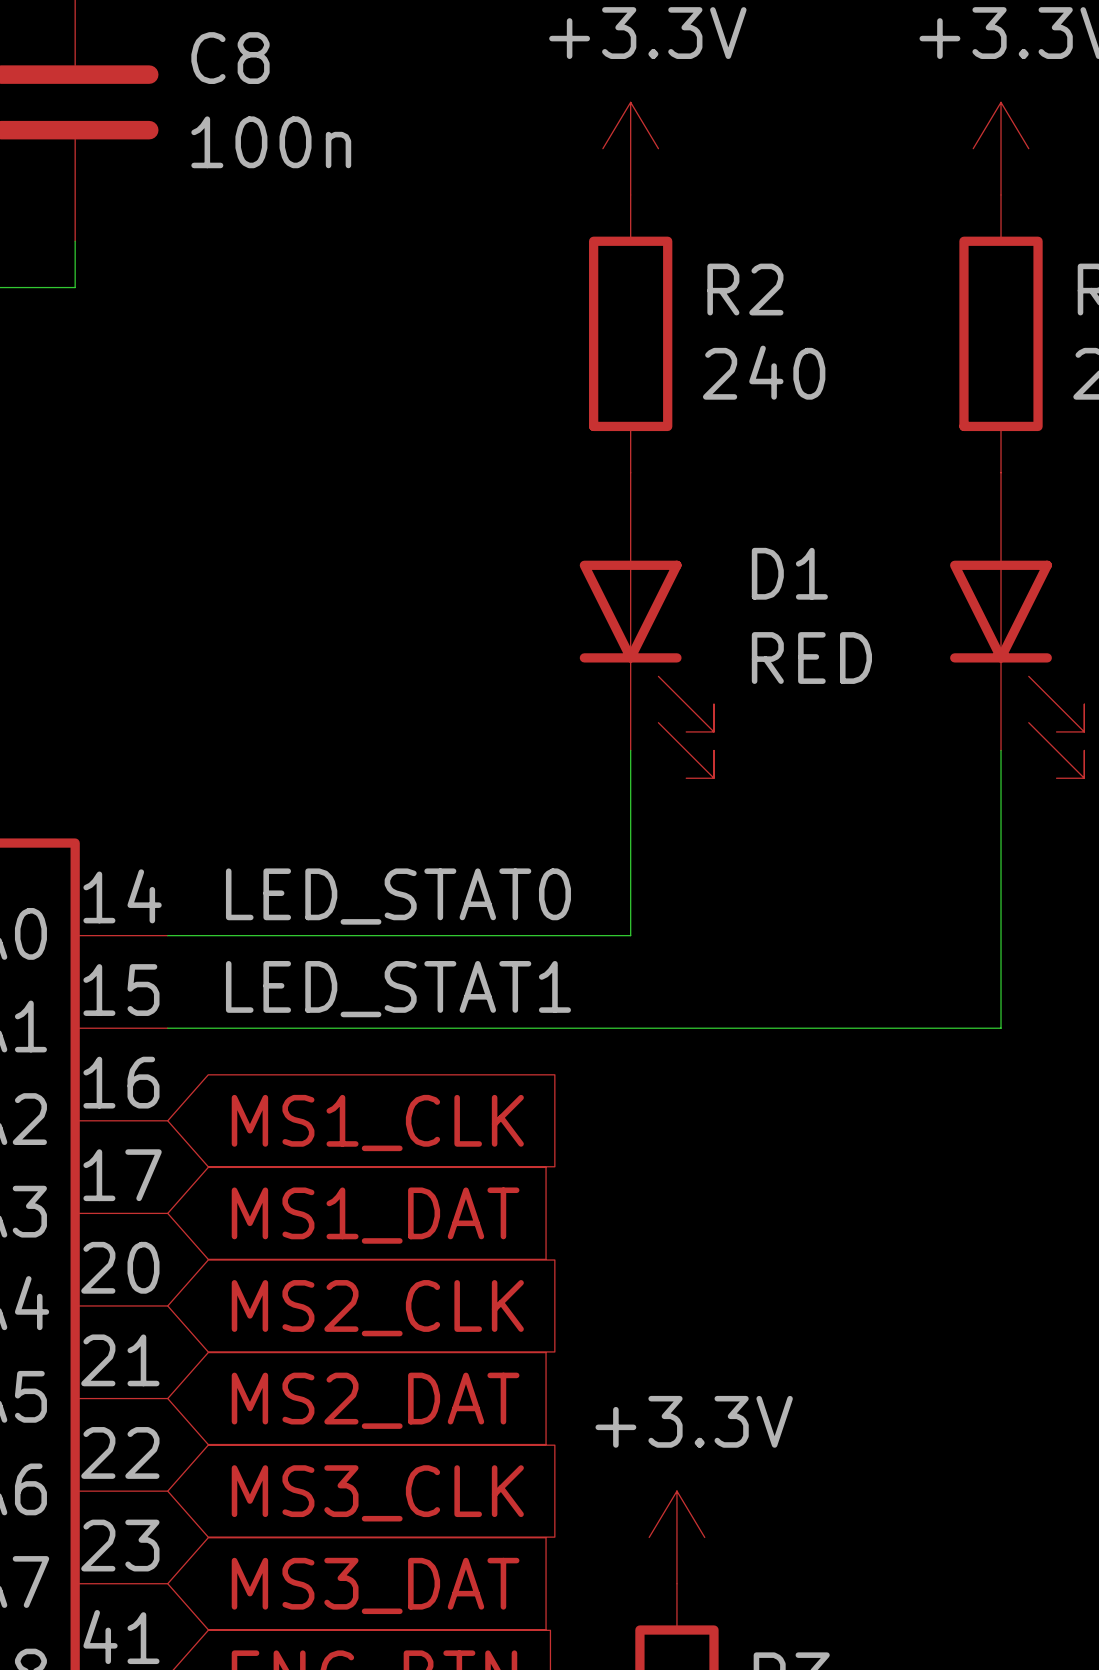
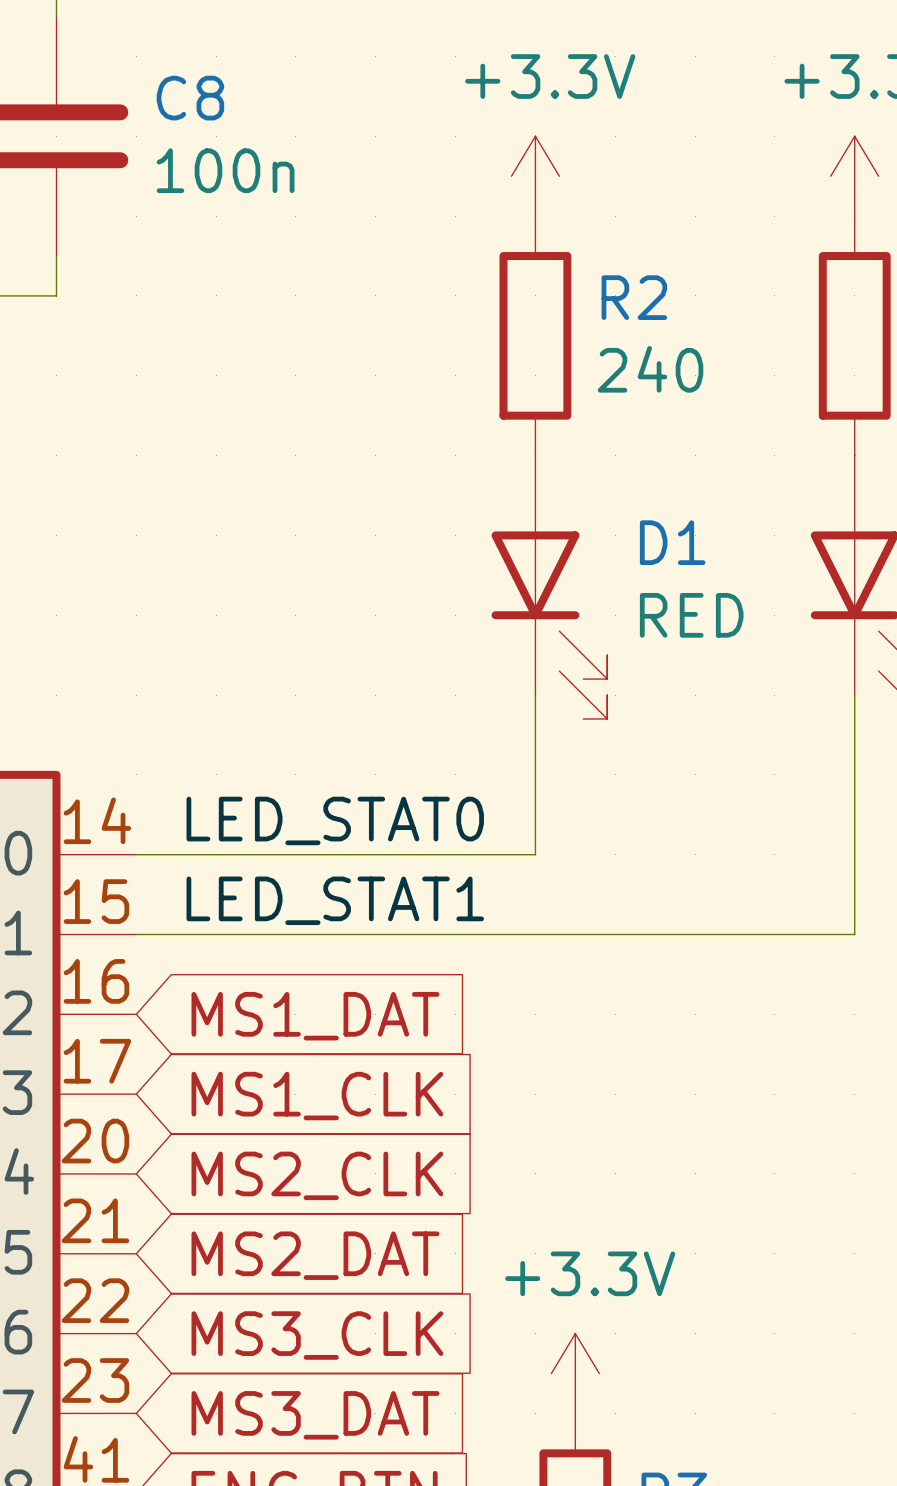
global label: MS1_CLK (377, 1123) -> MS1_DAT (315, 1016)
global label: MS1_DAT (375, 1215) -> MS1_CLK (317, 1096)

